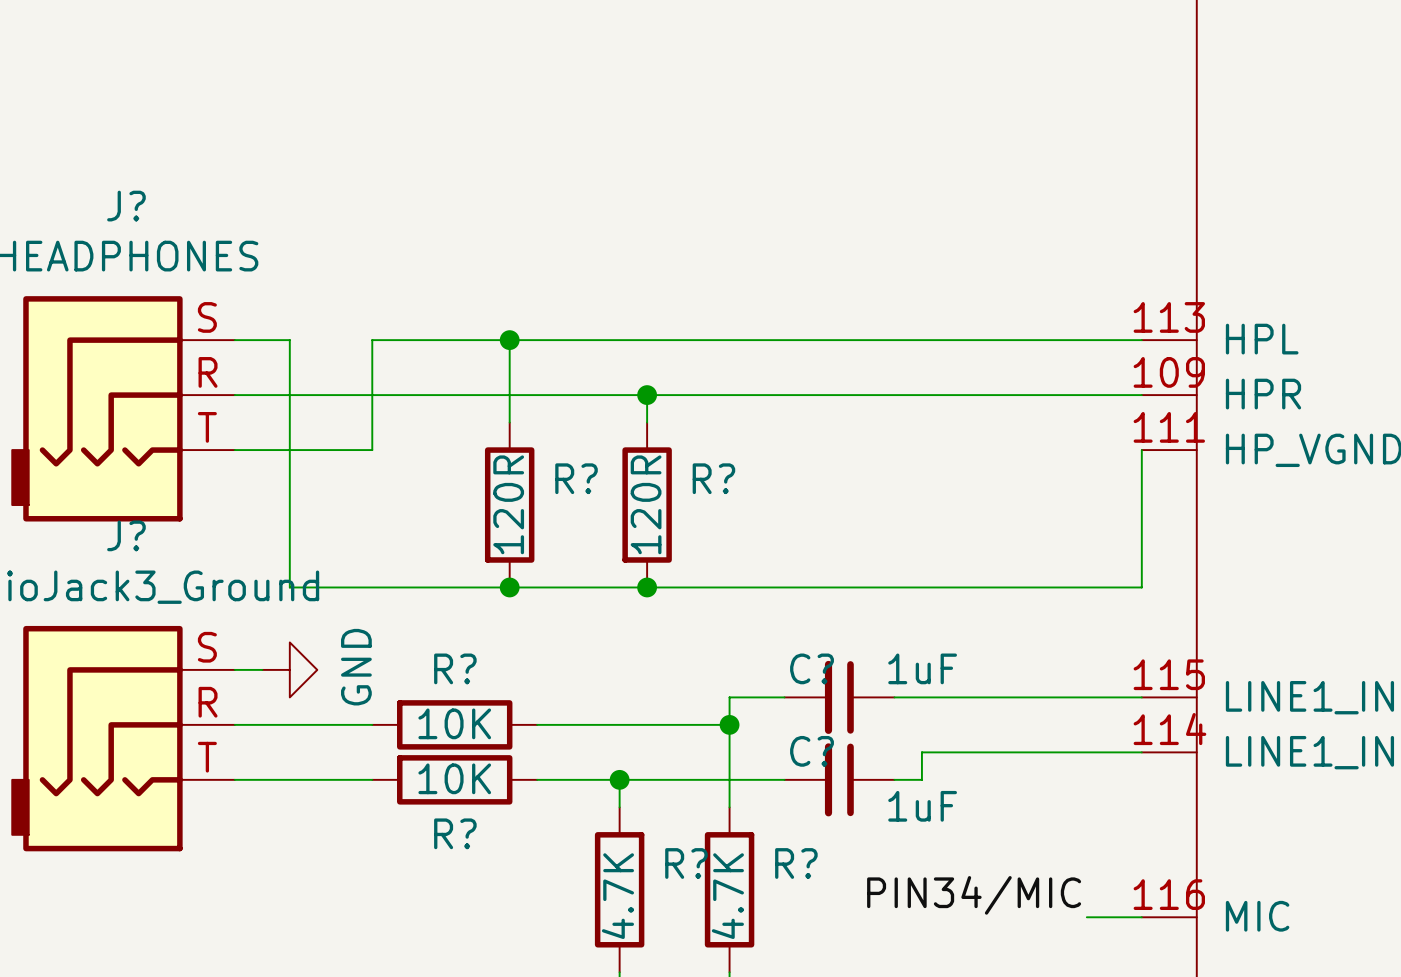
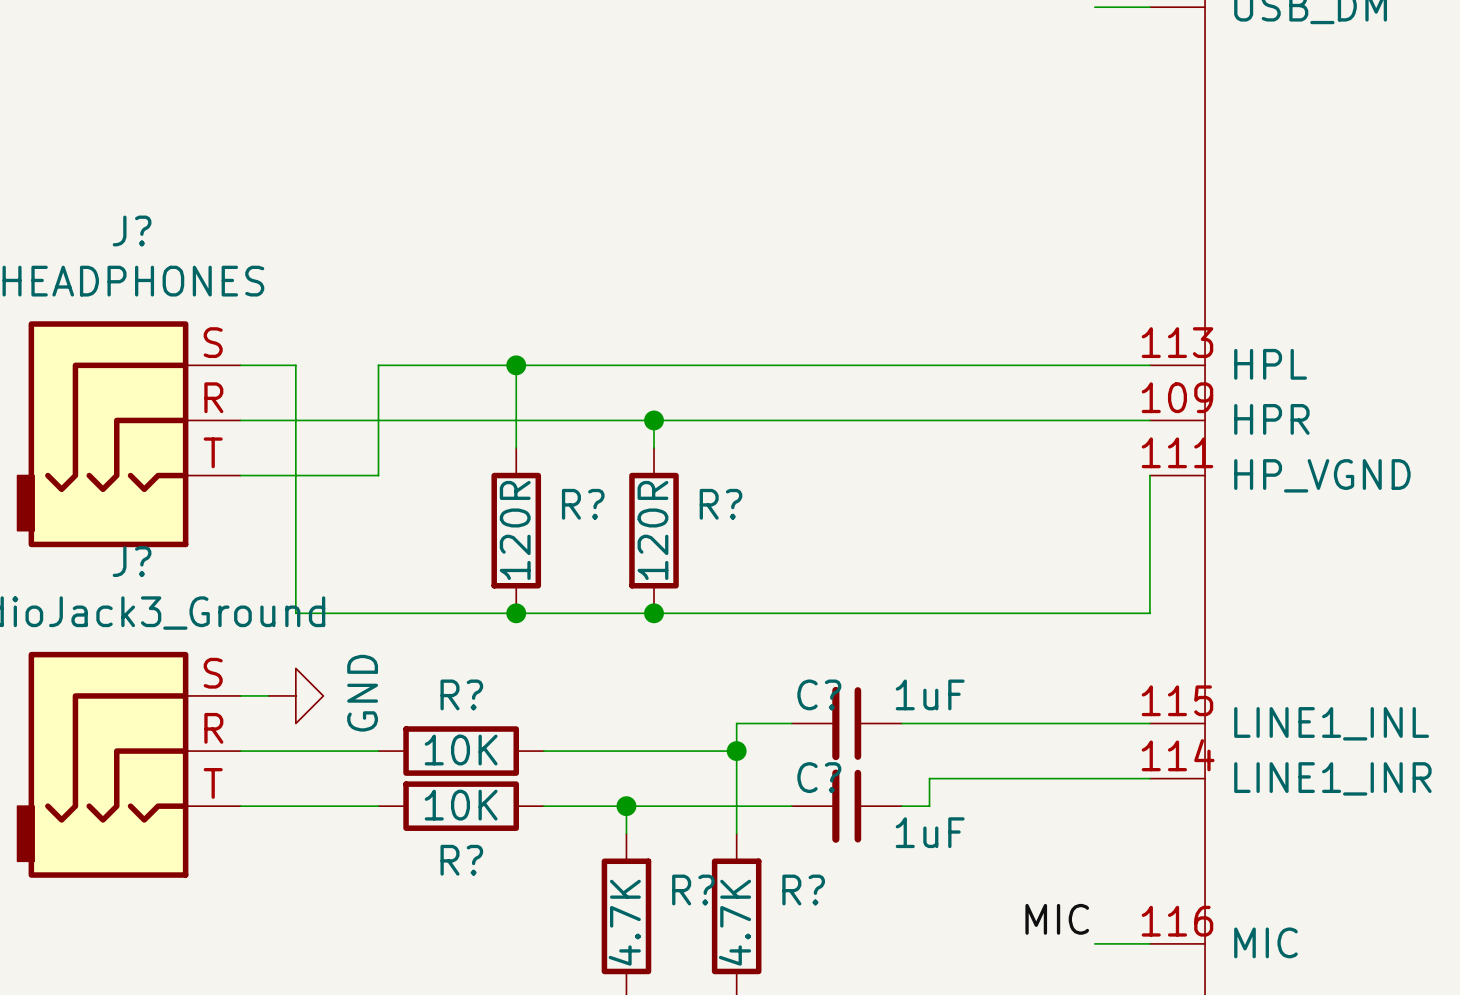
label: PIN34/MIC (974, 895) -> MIC (1057, 919)

